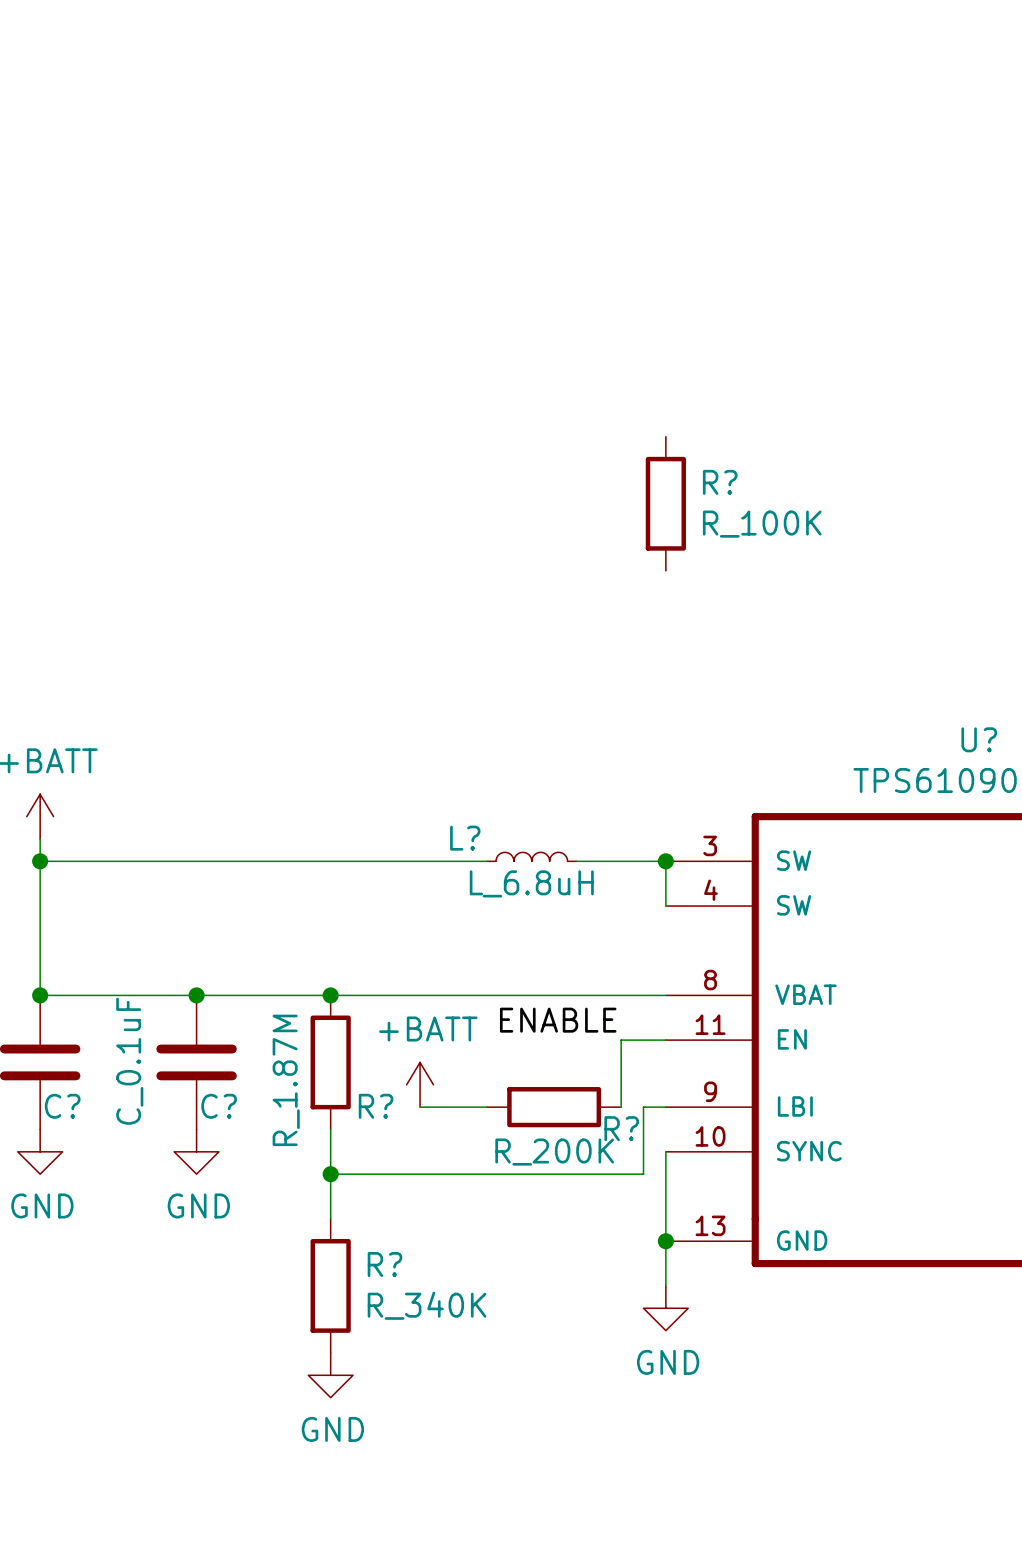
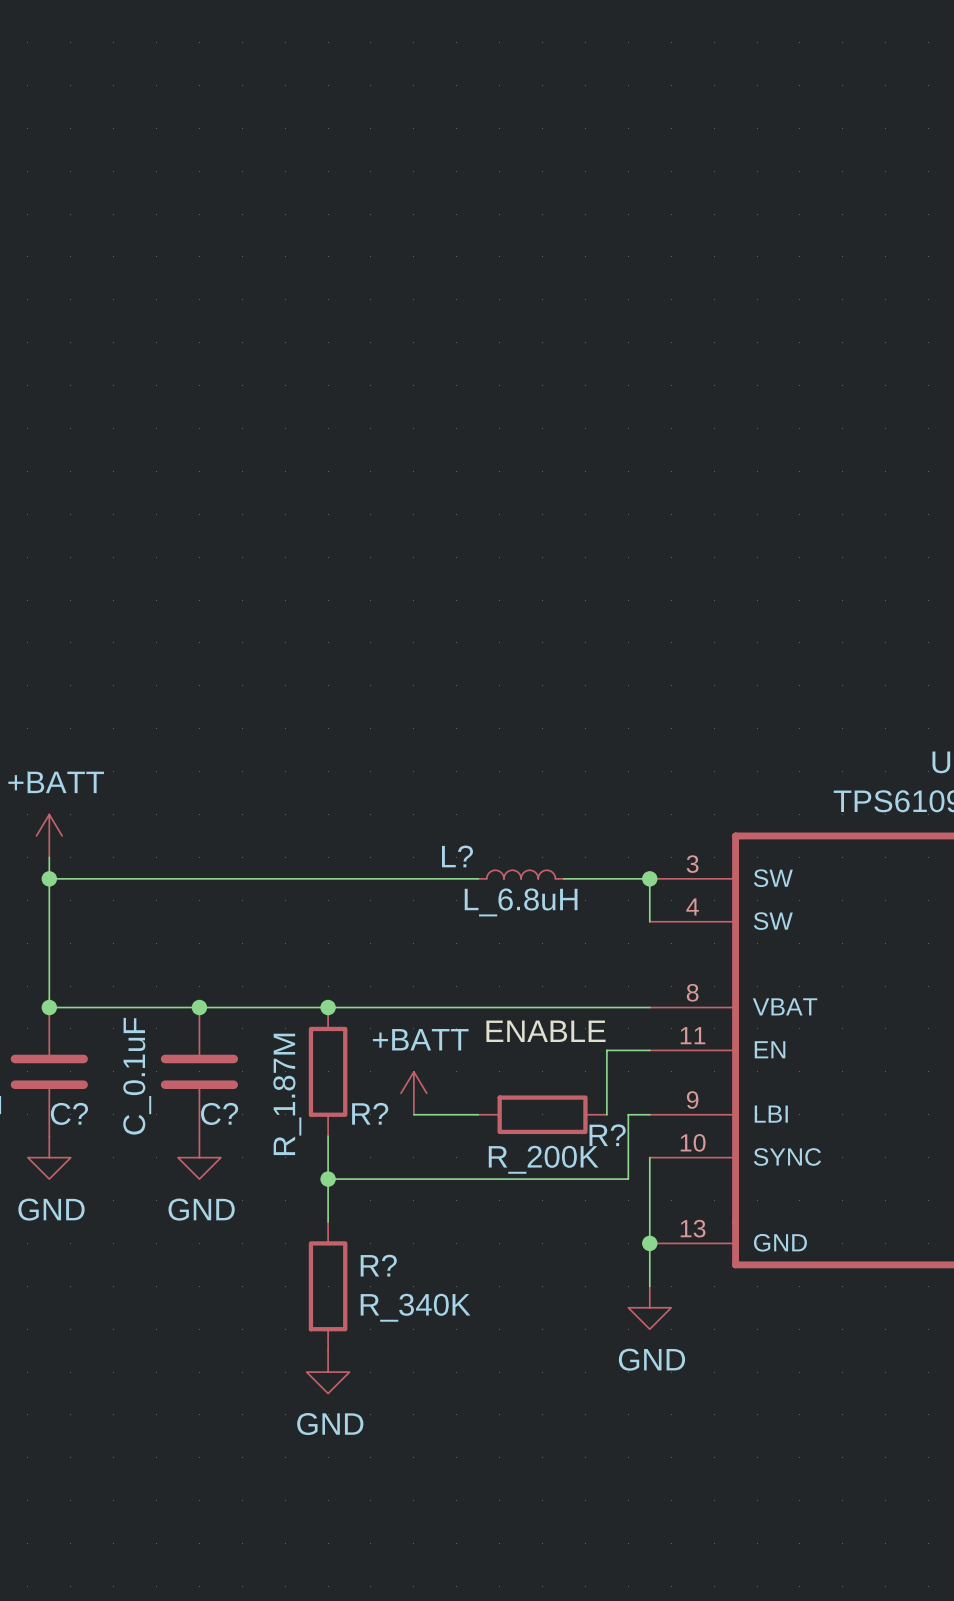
R?: R_100K (665, 503) -> none

